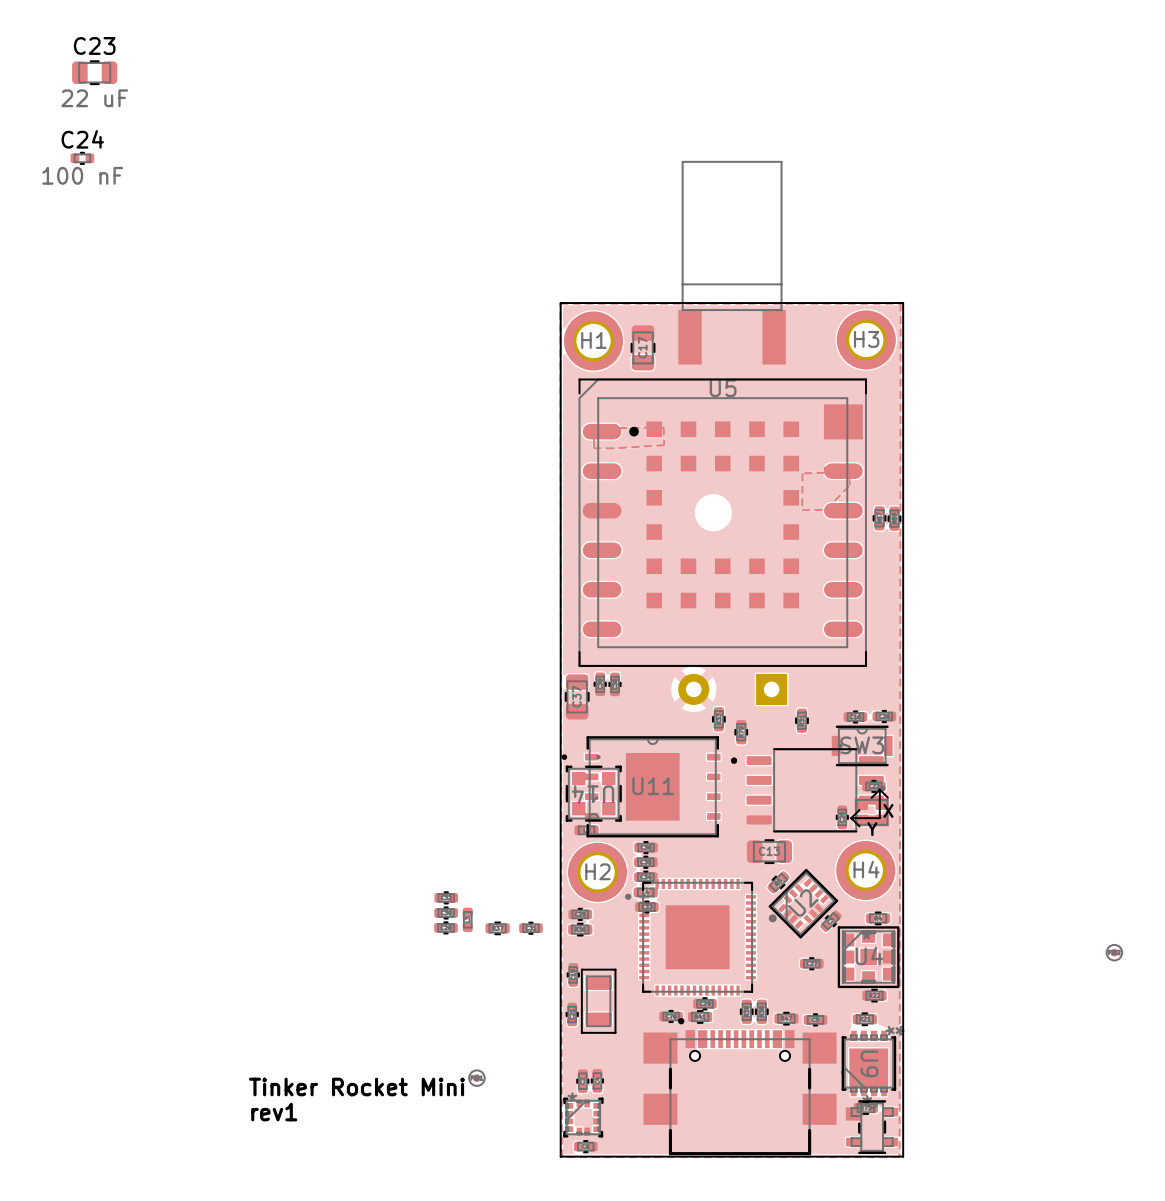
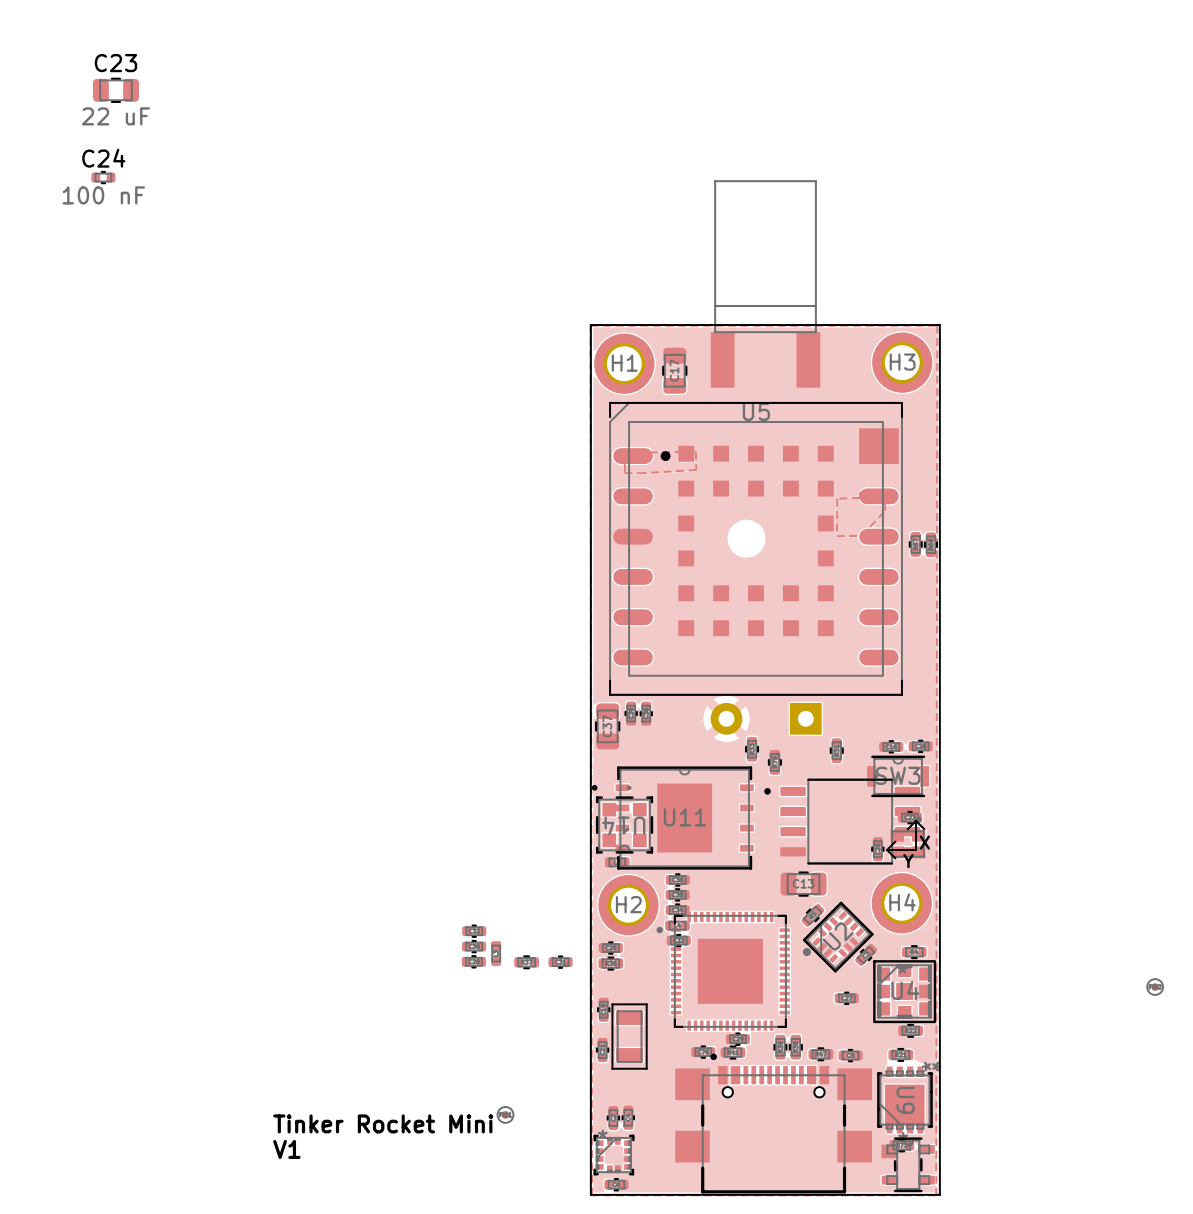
text: rev1 (274, 1112) -> V1 (286, 1149)

